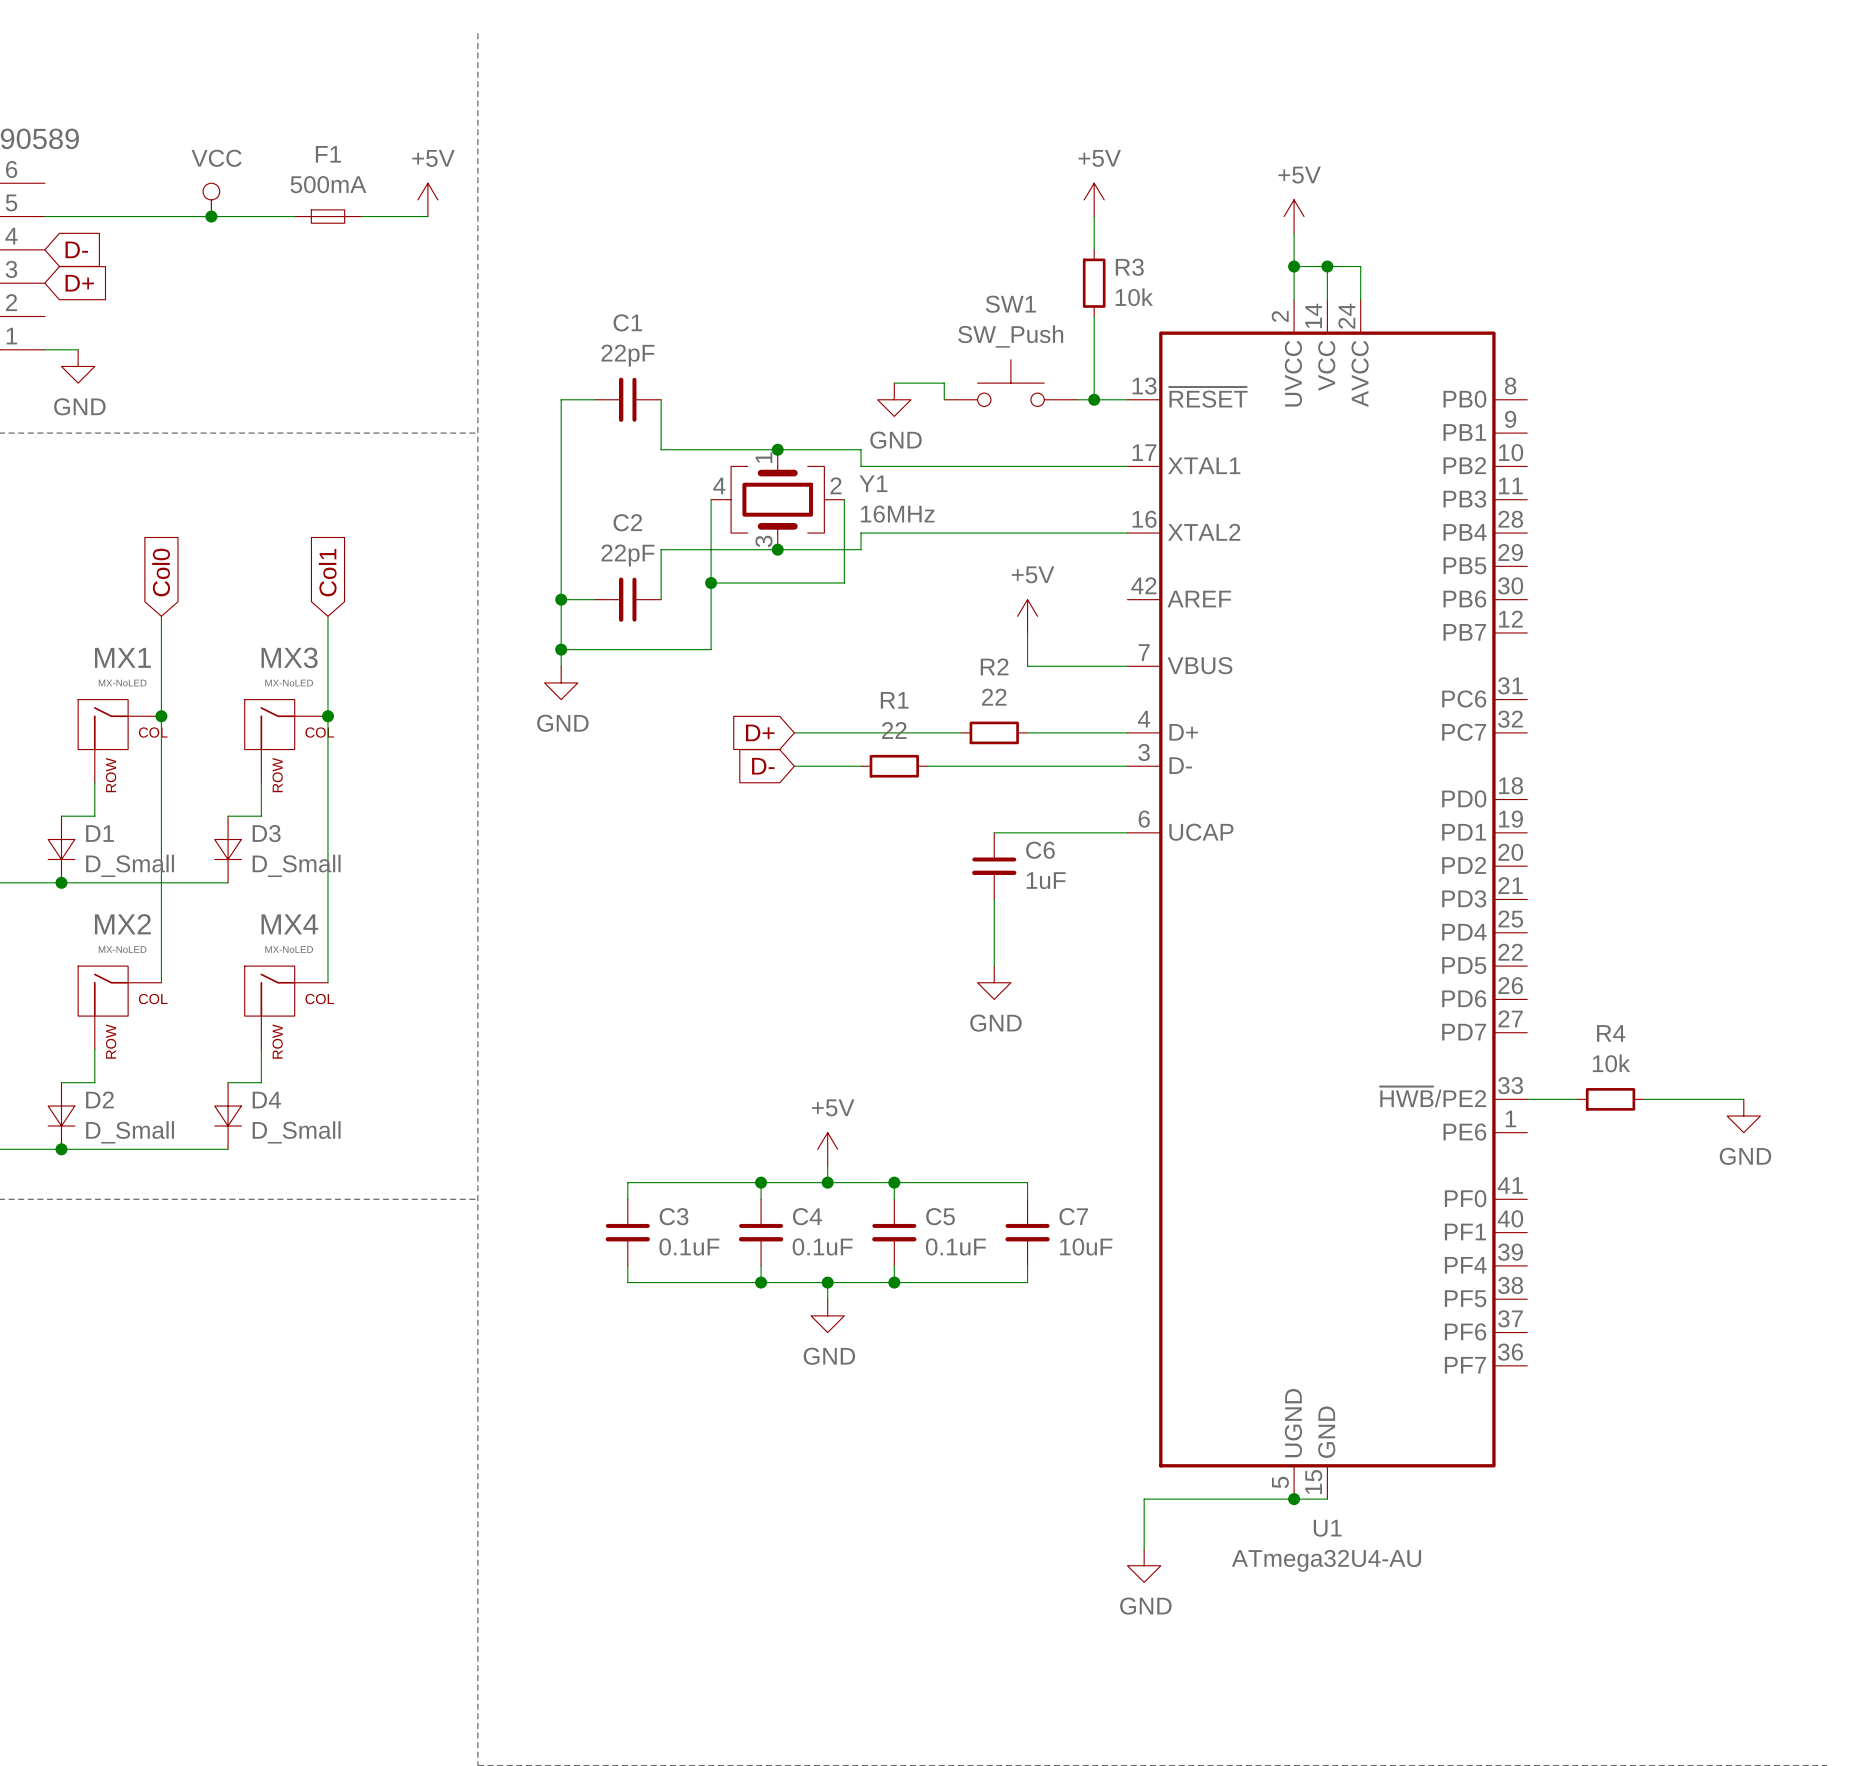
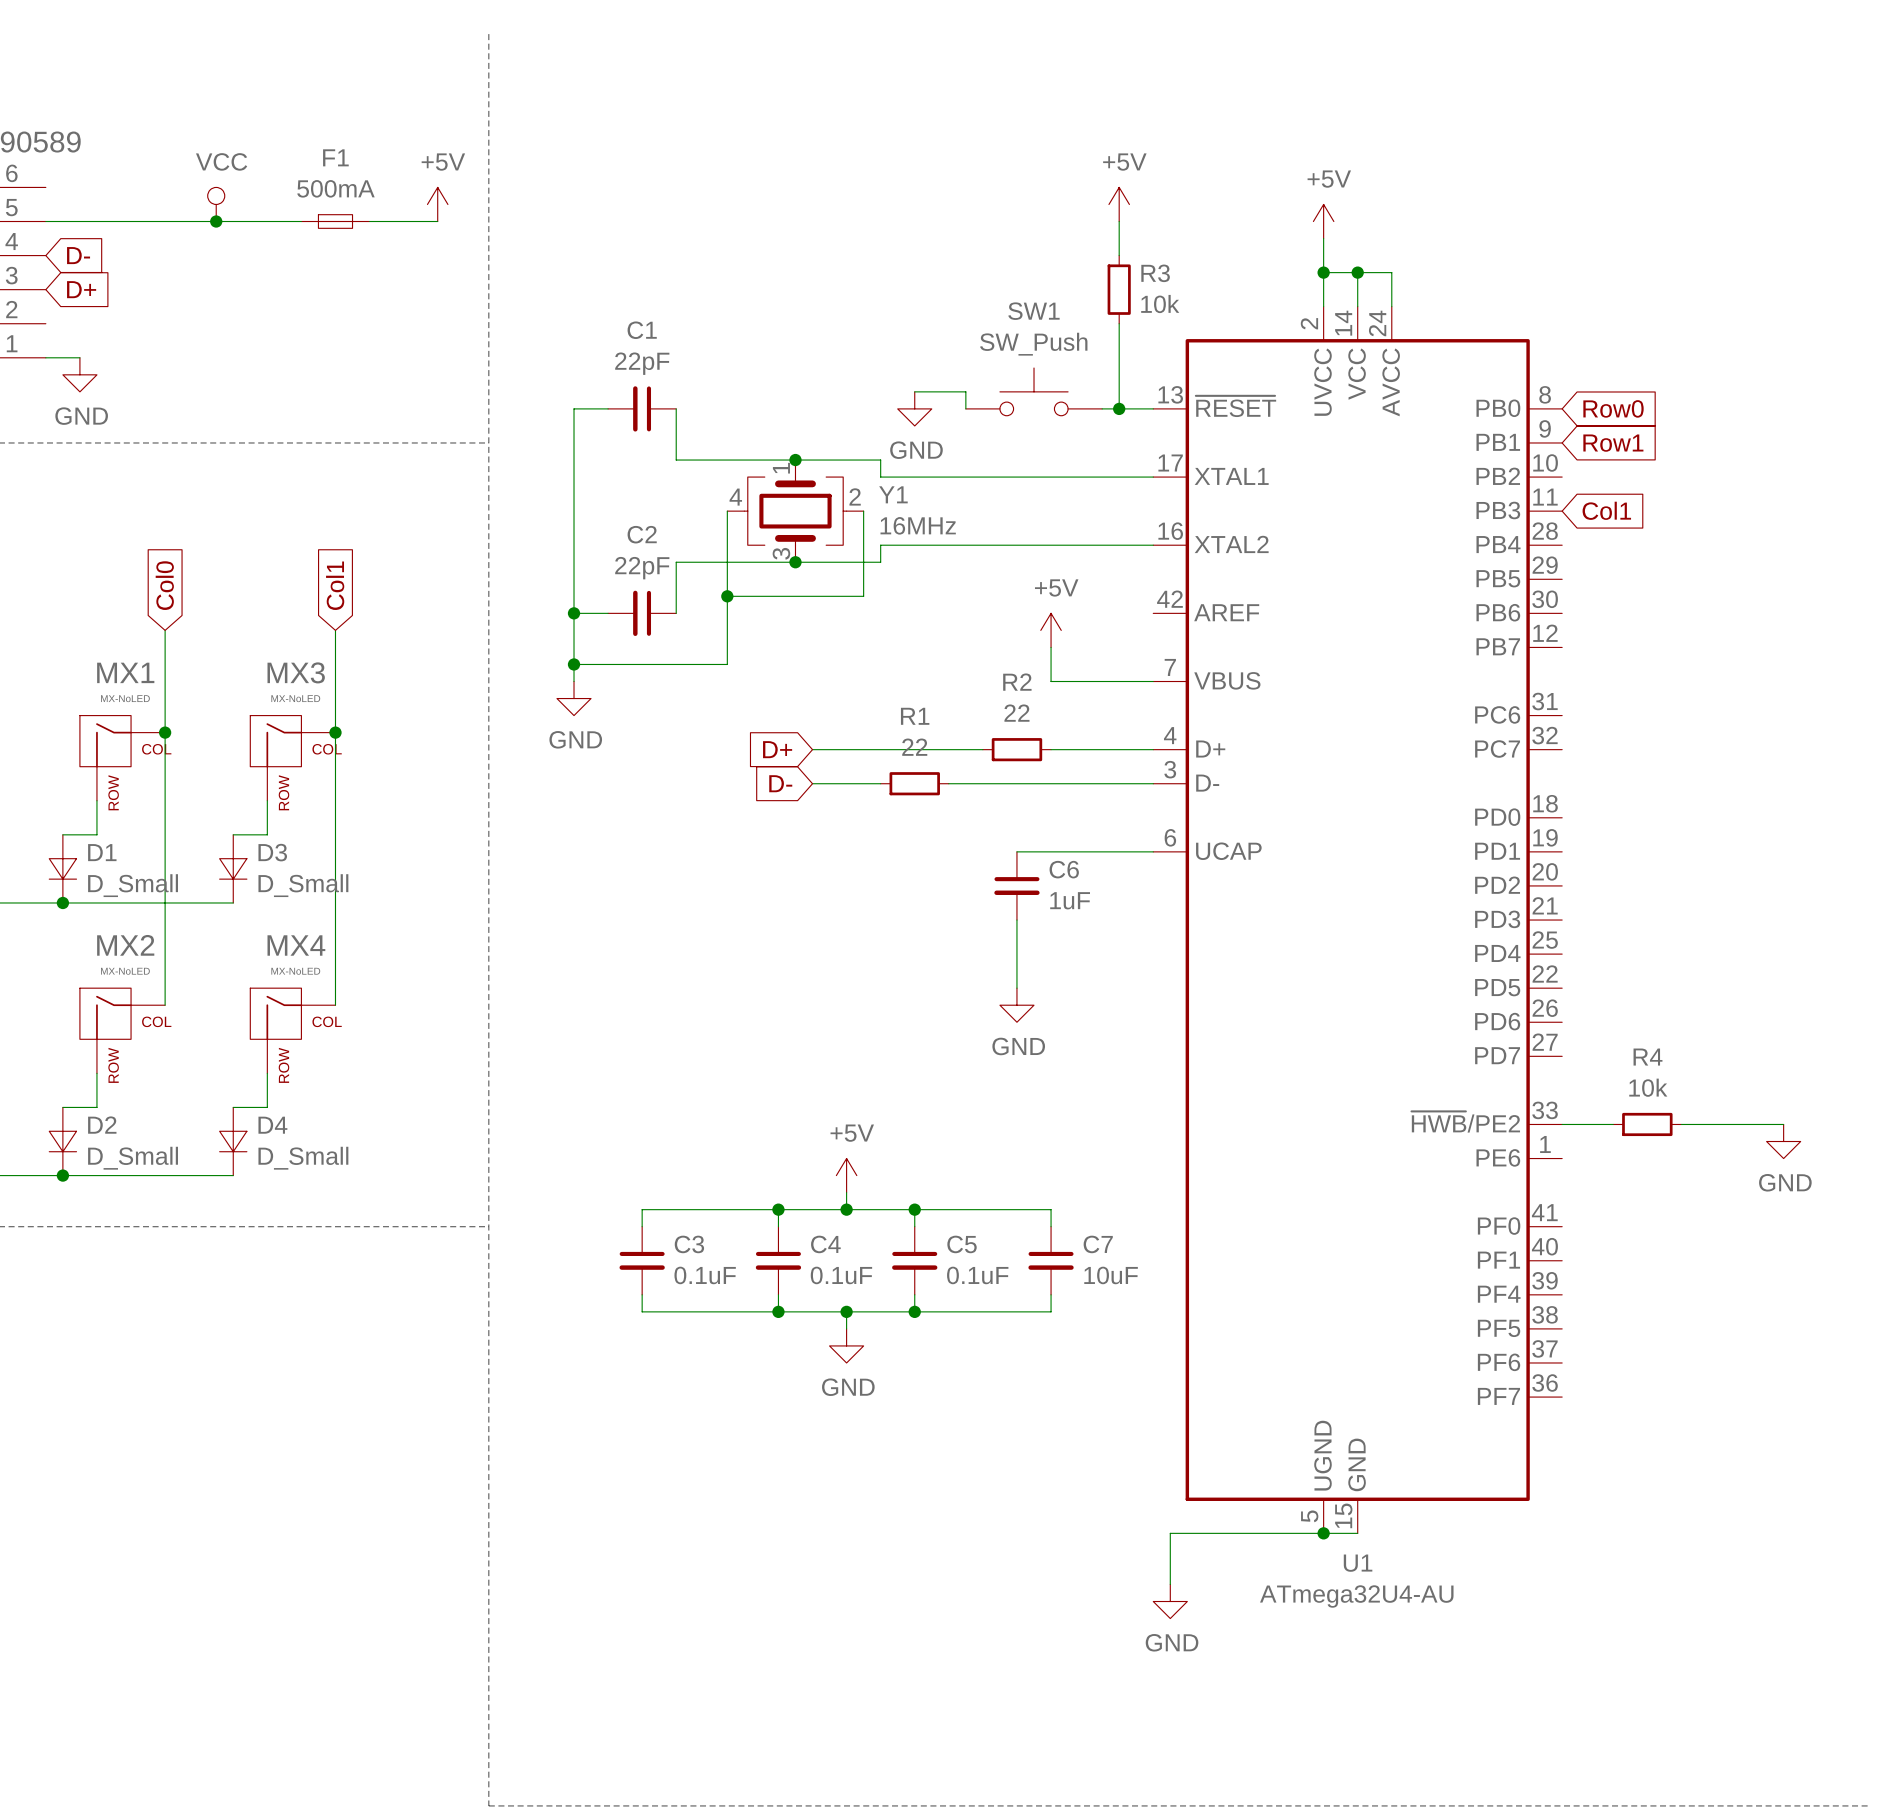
global label: none -> Row0 (1613, 408)
global label: none -> Row1 (1613, 443)
global label: none -> Col1 (1606, 510)

